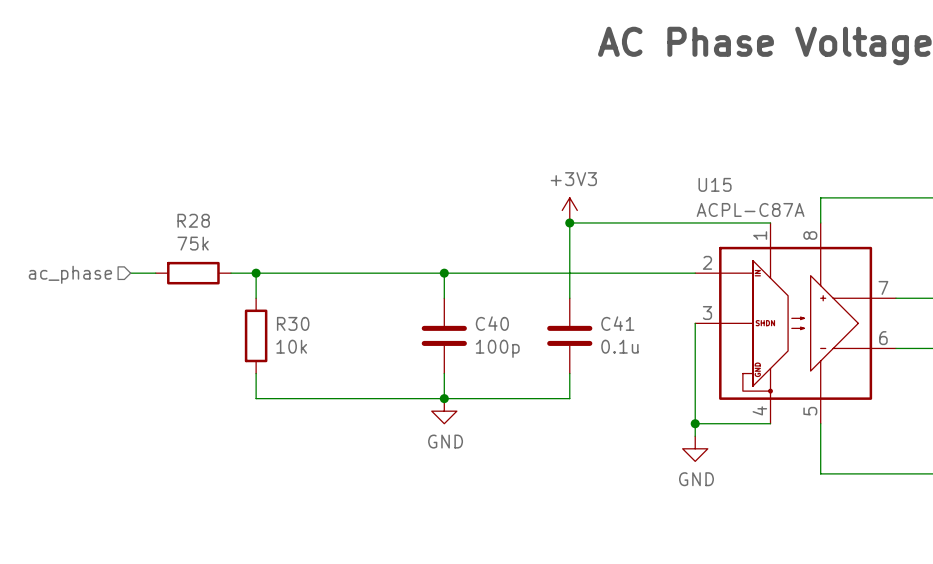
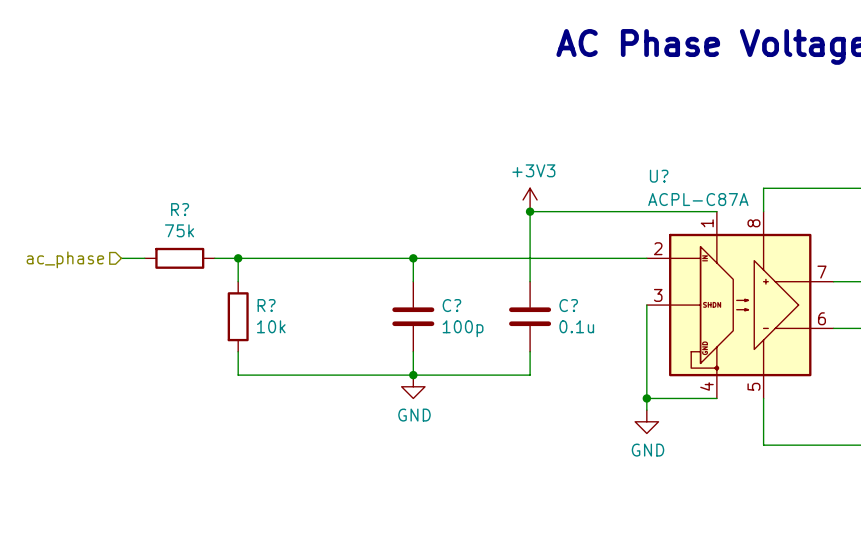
U15 name: U15 (715, 184) -> U? (659, 176)
R28 name: R28 (193, 220) -> R? (180, 209)
R30 name: R30 (293, 323) -> R? (266, 305)
C40 name: C40 (492, 323) -> C? (451, 305)
C41 name: C41 (617, 323) -> C? (568, 305)

